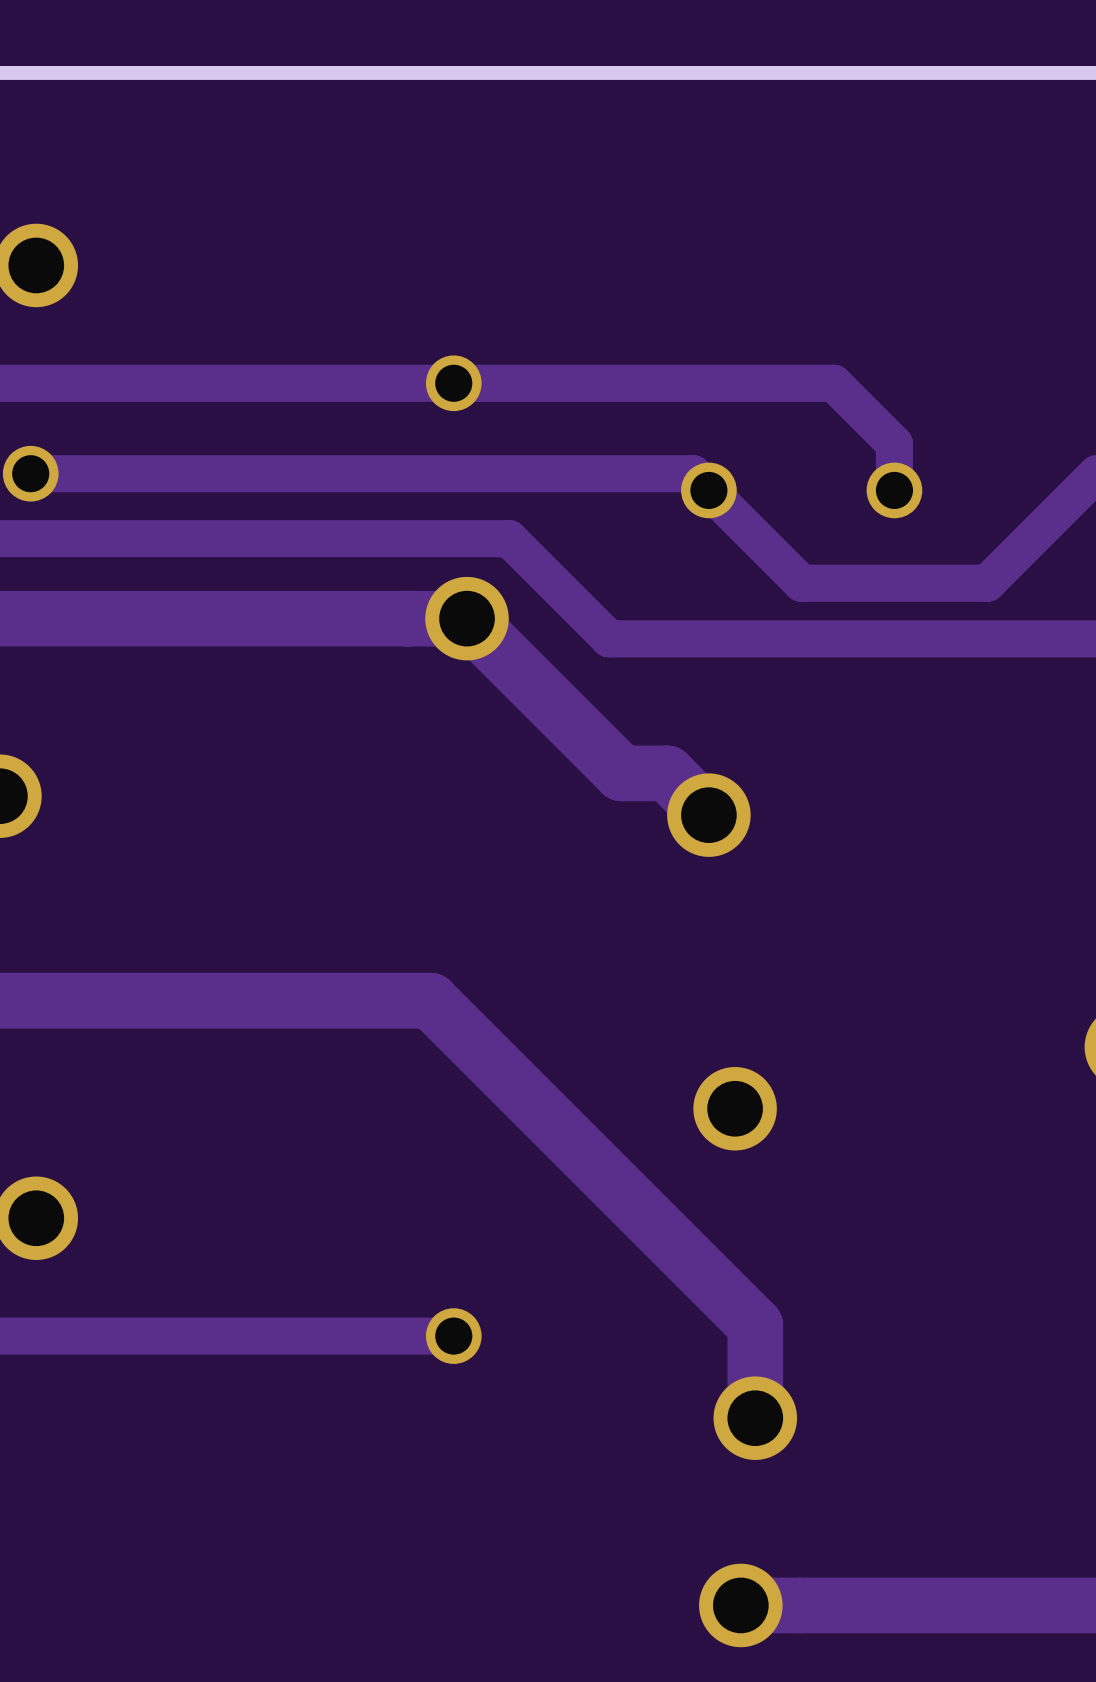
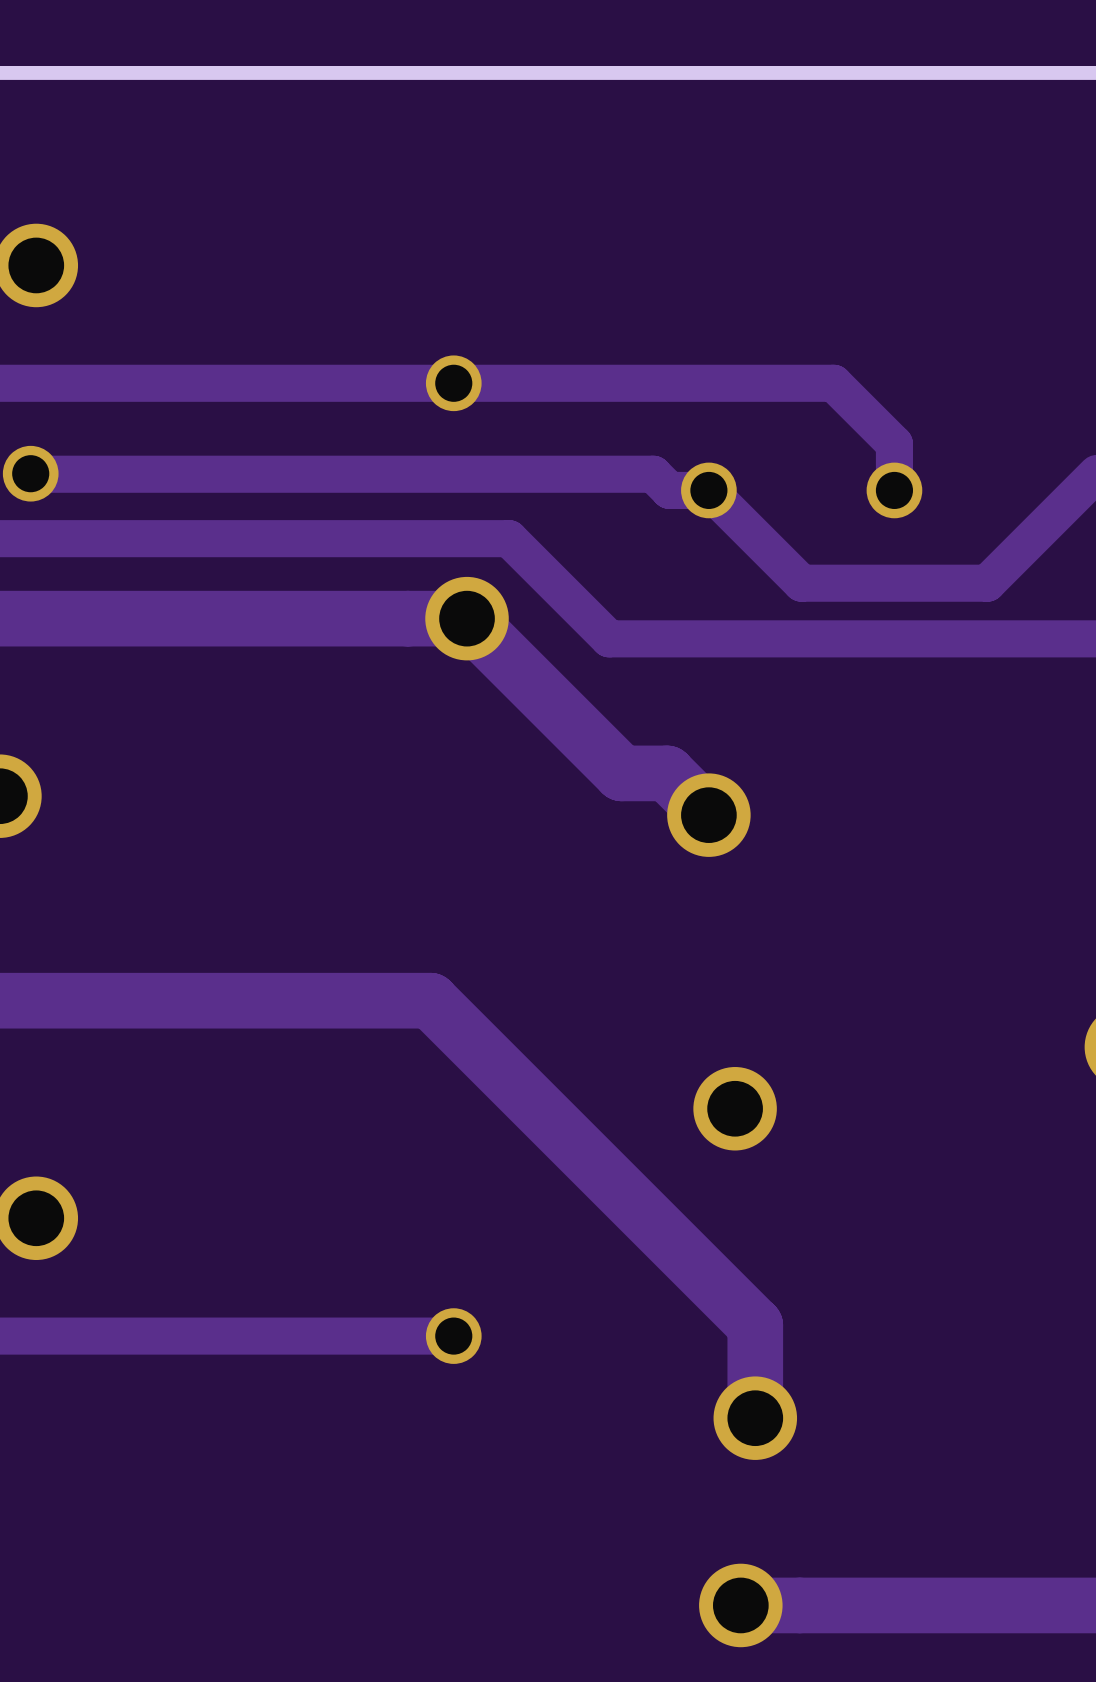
track: (30, 473) (692, 473) (708, 489) -> (26, 474) (653, 474) (669, 490) (708, 490)

